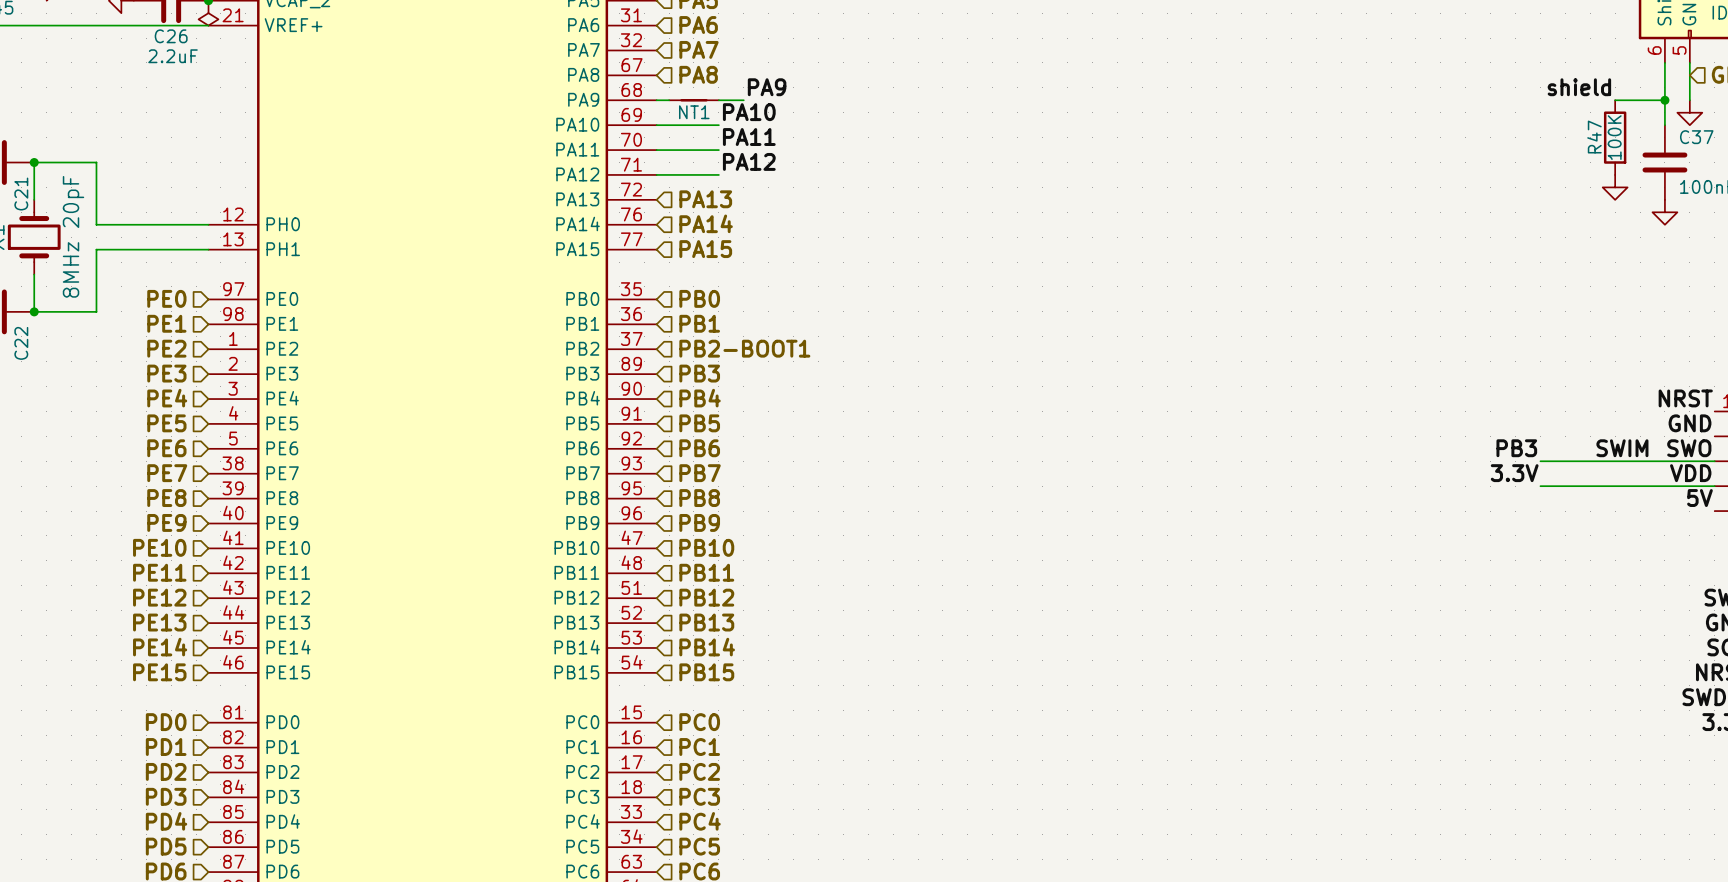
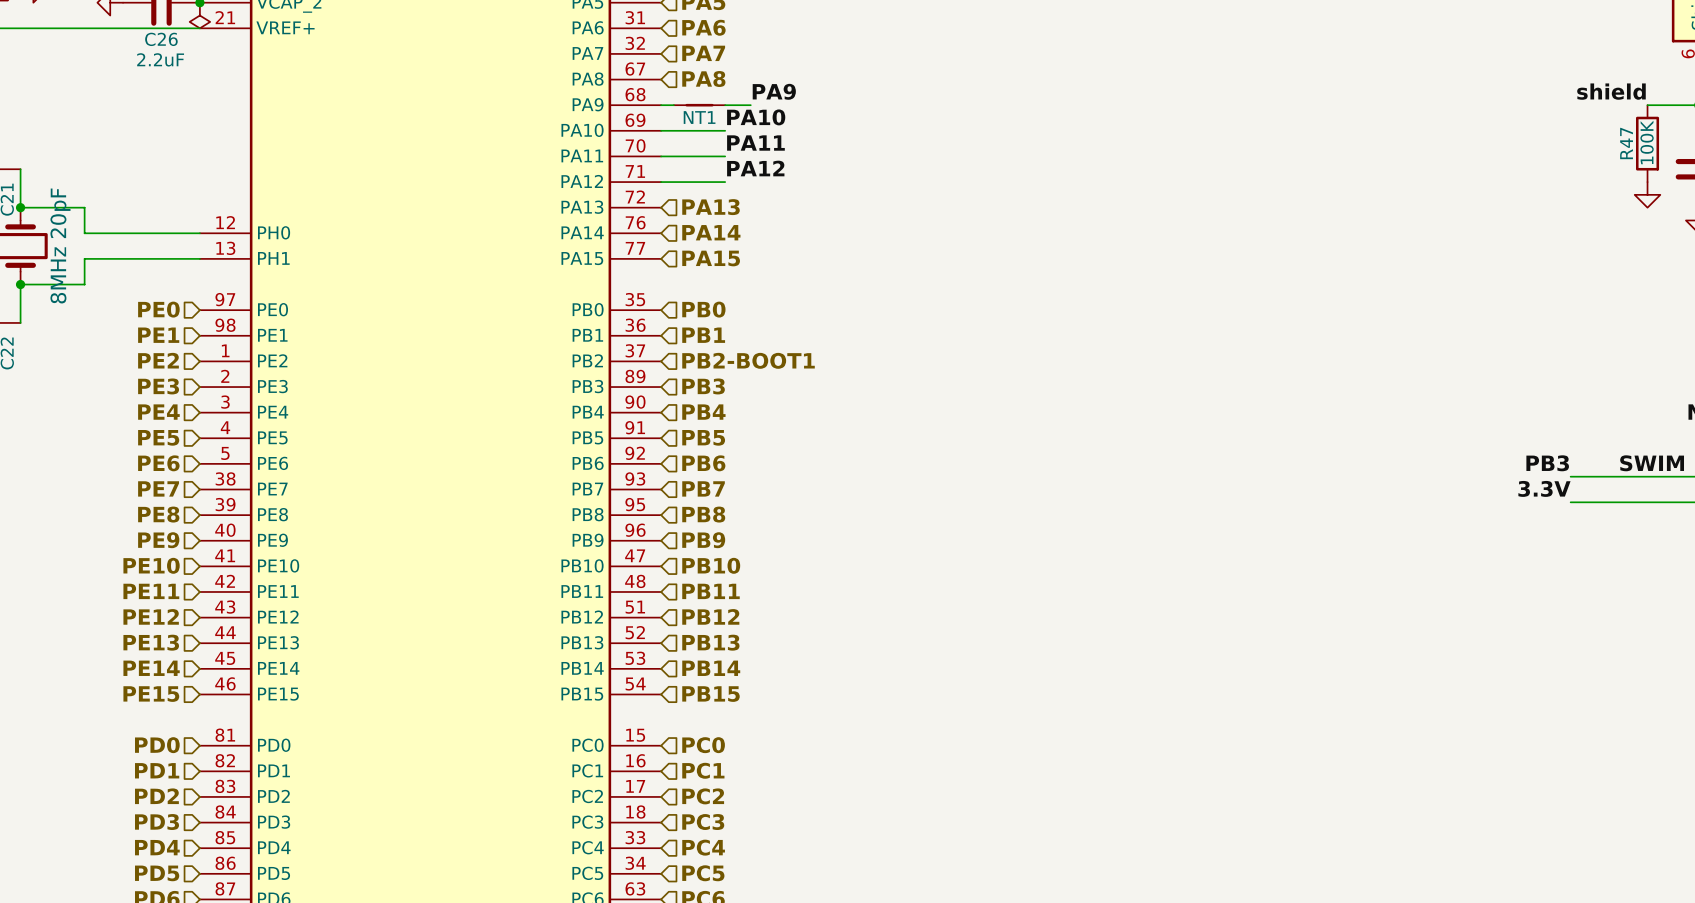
wire: (34, 162) (96, 162) (96, 199) -> (20, 207) (84, 207)
junction position: (34, 162) -> (20, 207)
wire: (96, 274) (96, 311) (34, 311) -> (84, 284) (20, 284)
junction position: (34, 311) -> (20, 284)

